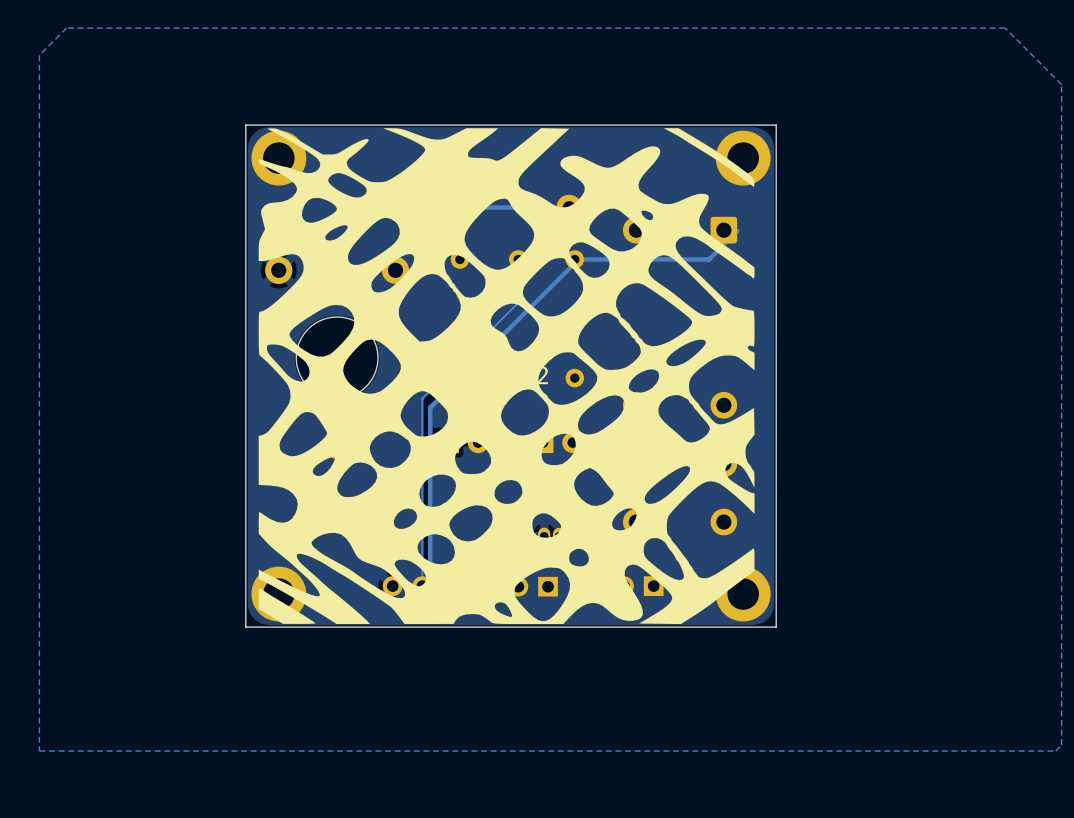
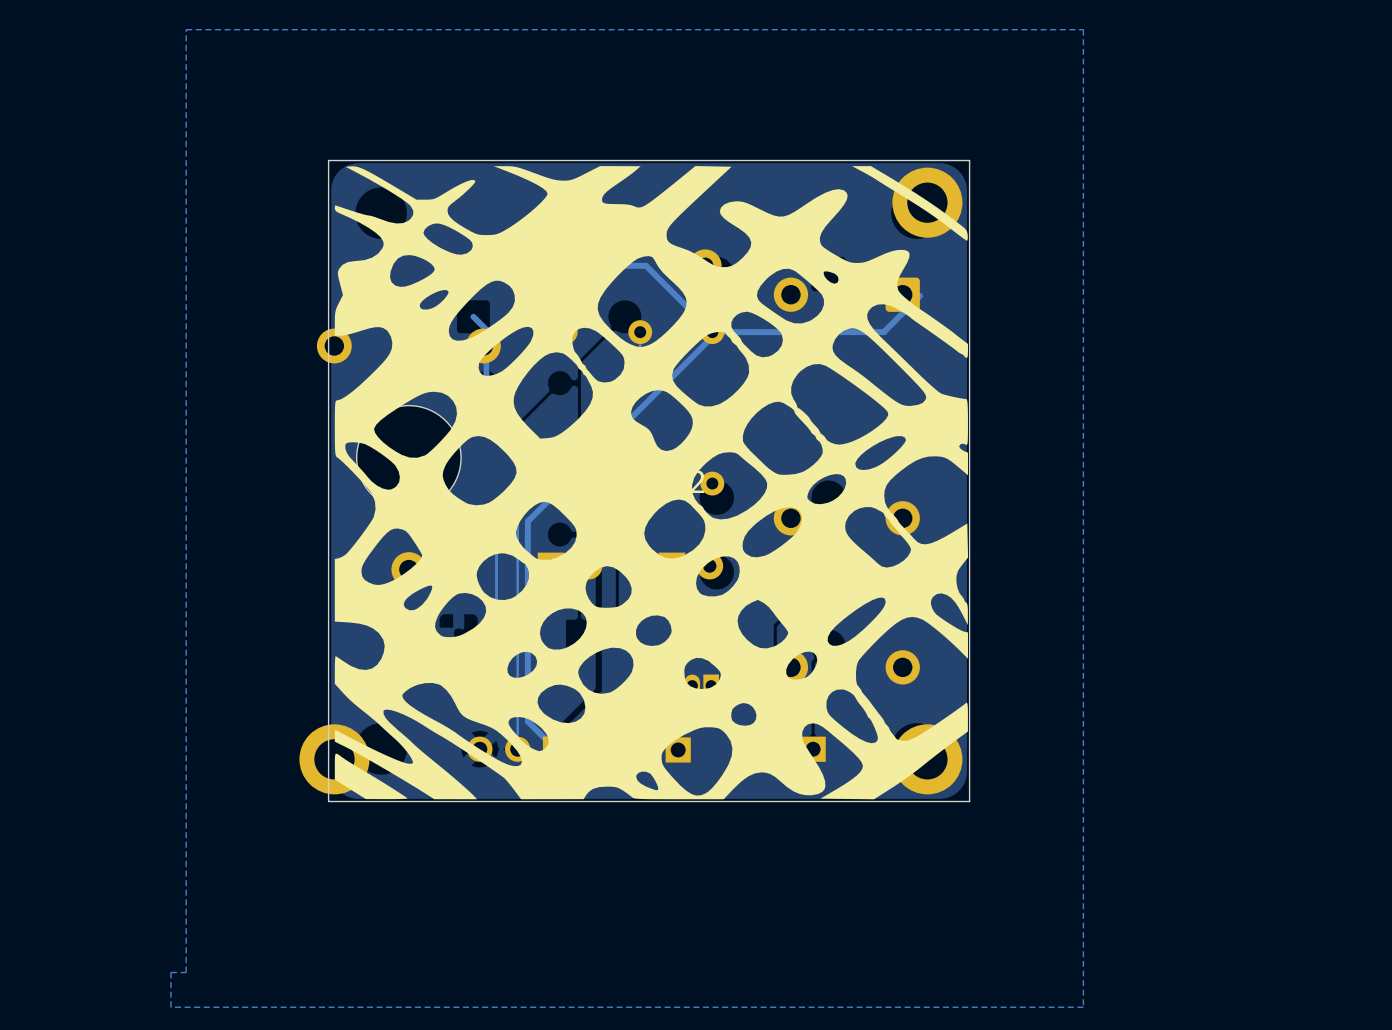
zone outline: (1005, 28) (1061, 84) (1061, 745) (1055, 751) (39, 751) (39, 55) (66, 28) (1005, 28) -> (1083, 29) (1083, 1007) (170, 1007) (170, 972) (186, 972) (186, 29) (1083, 29)
board edge: (274, 125) (245, 125) (245, 627) (274, 627) -> (328, 160) (328, 801)
part: (278, 158) -> none
track: none -> (473, 316) (486, 329) (486, 383)
part position: (506, 376) -> (651, 482)
track: none -> (486, 534) (496, 544) (496, 633)

